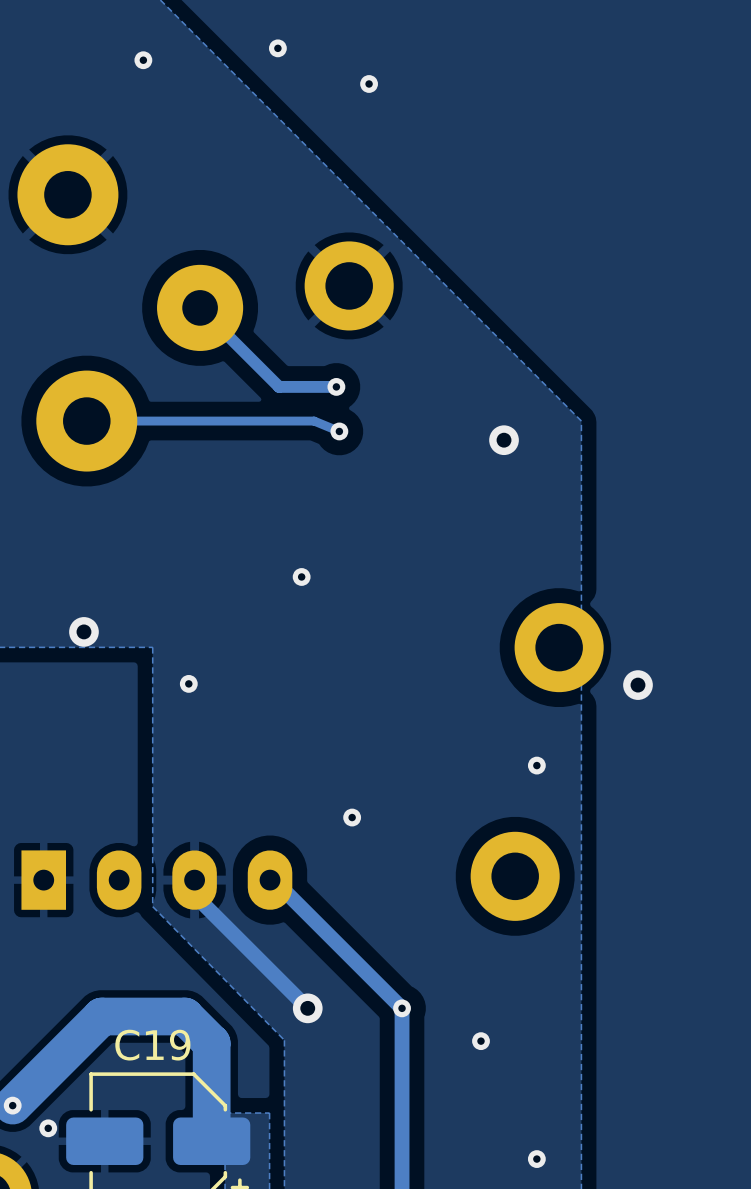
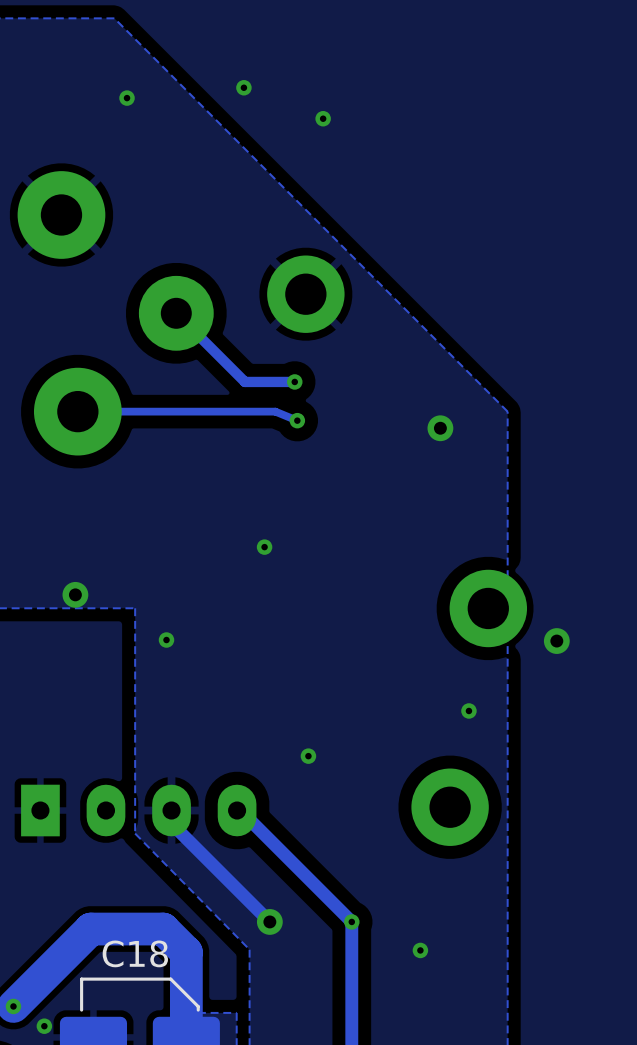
C19 name: C19 (152, 1045) -> C18 (135, 953)

